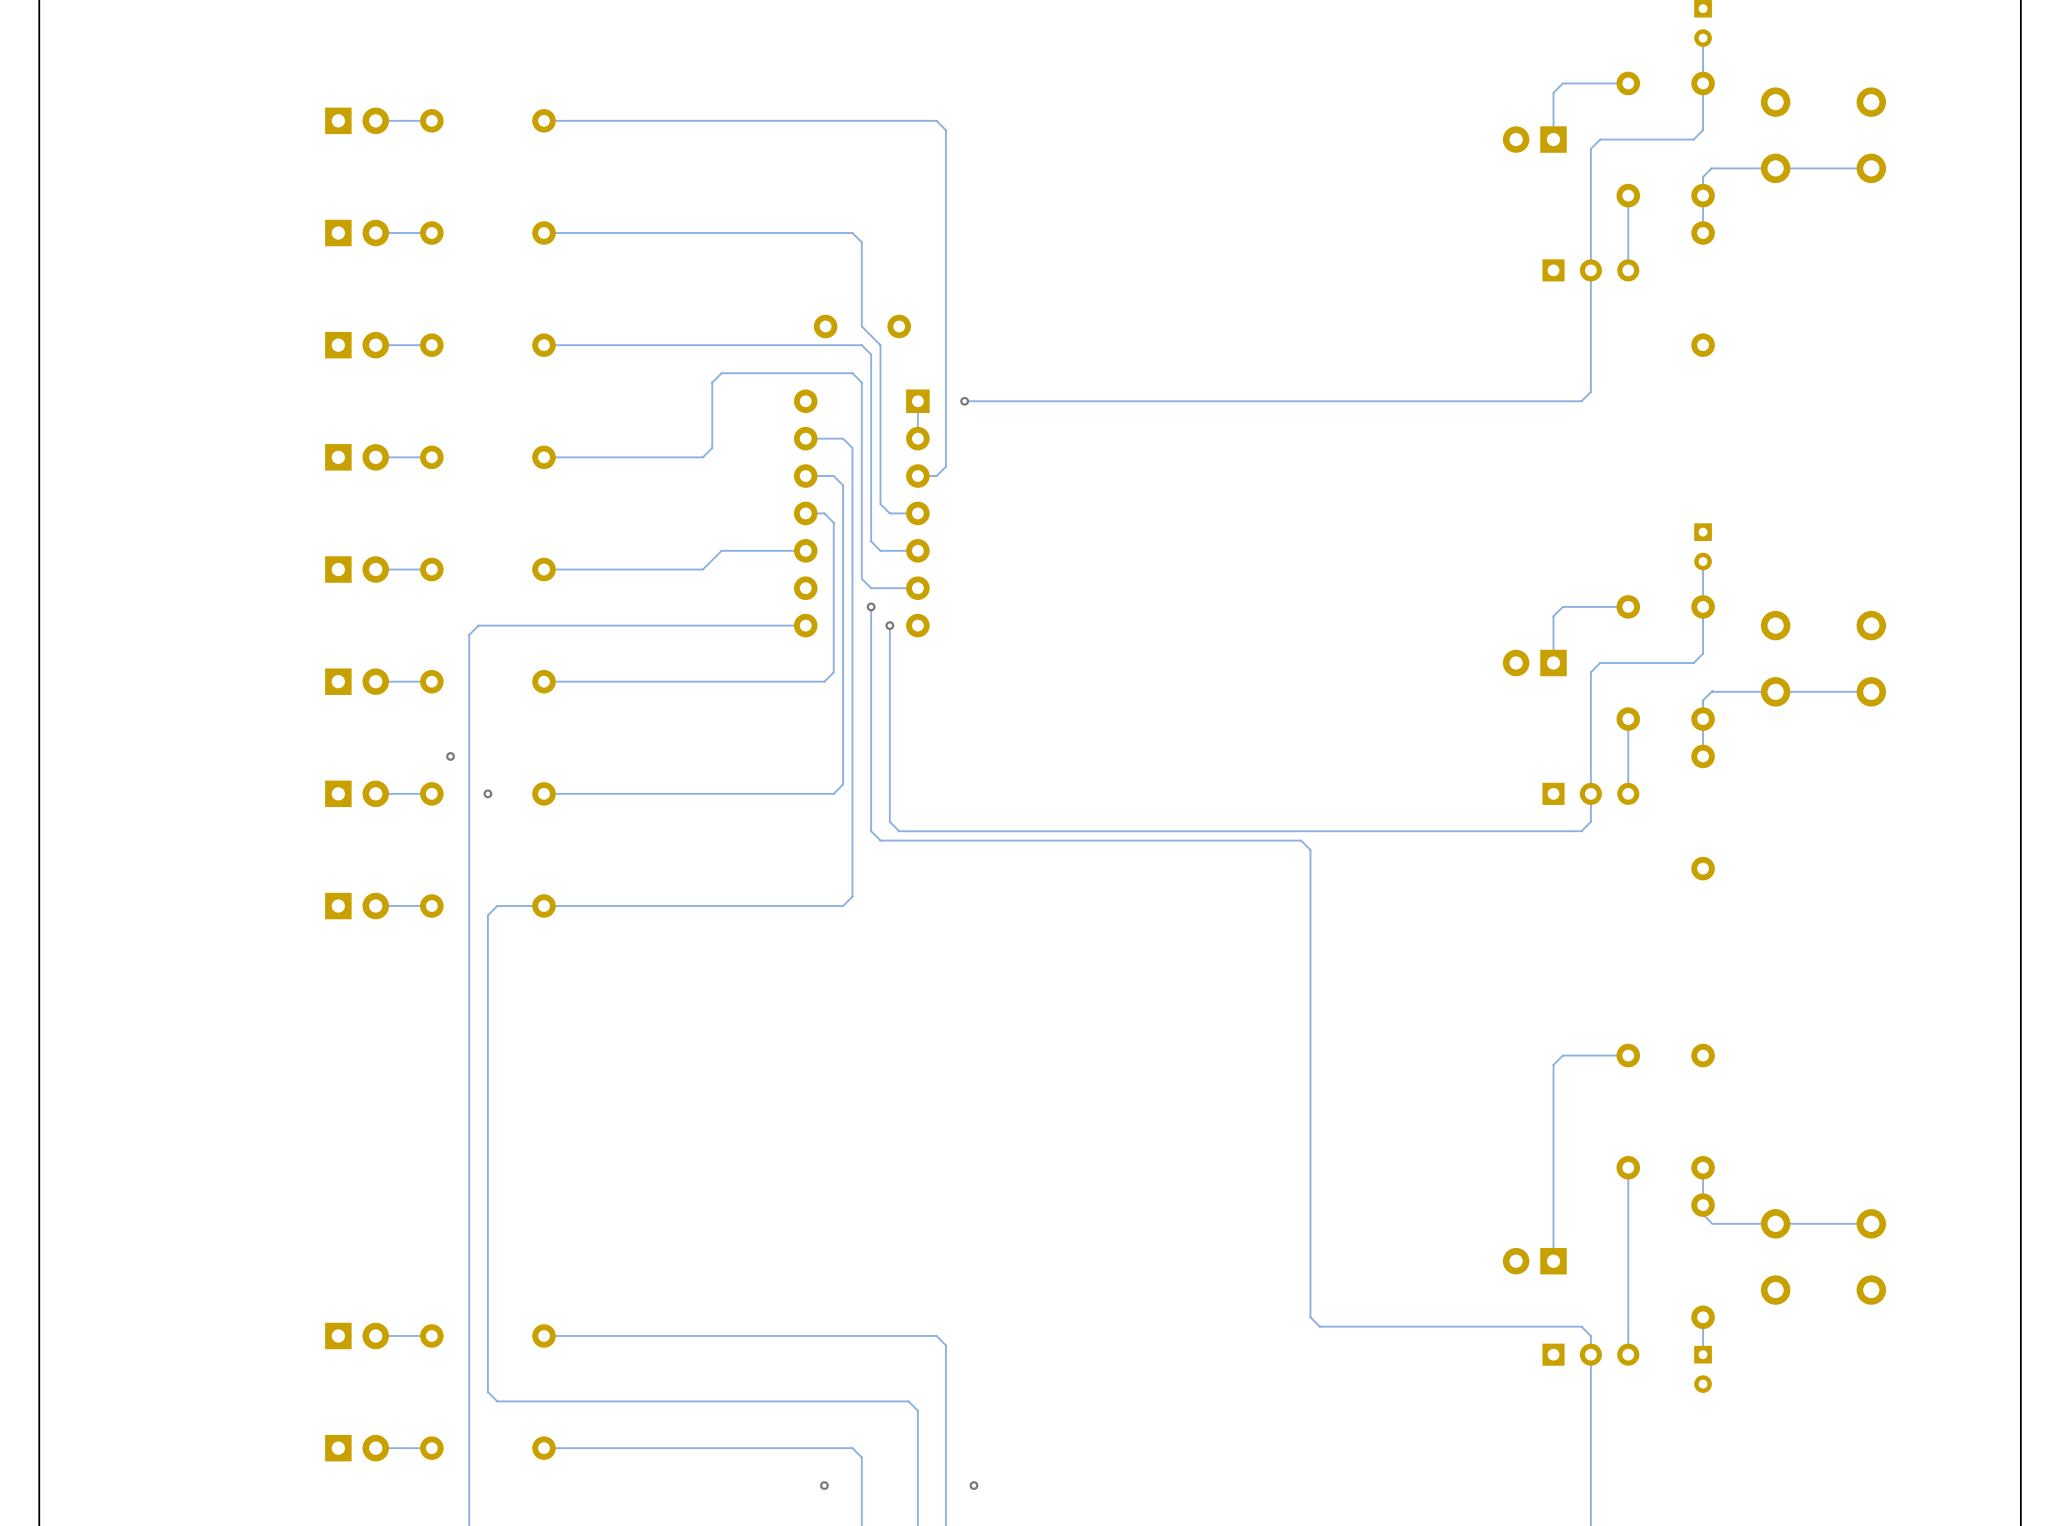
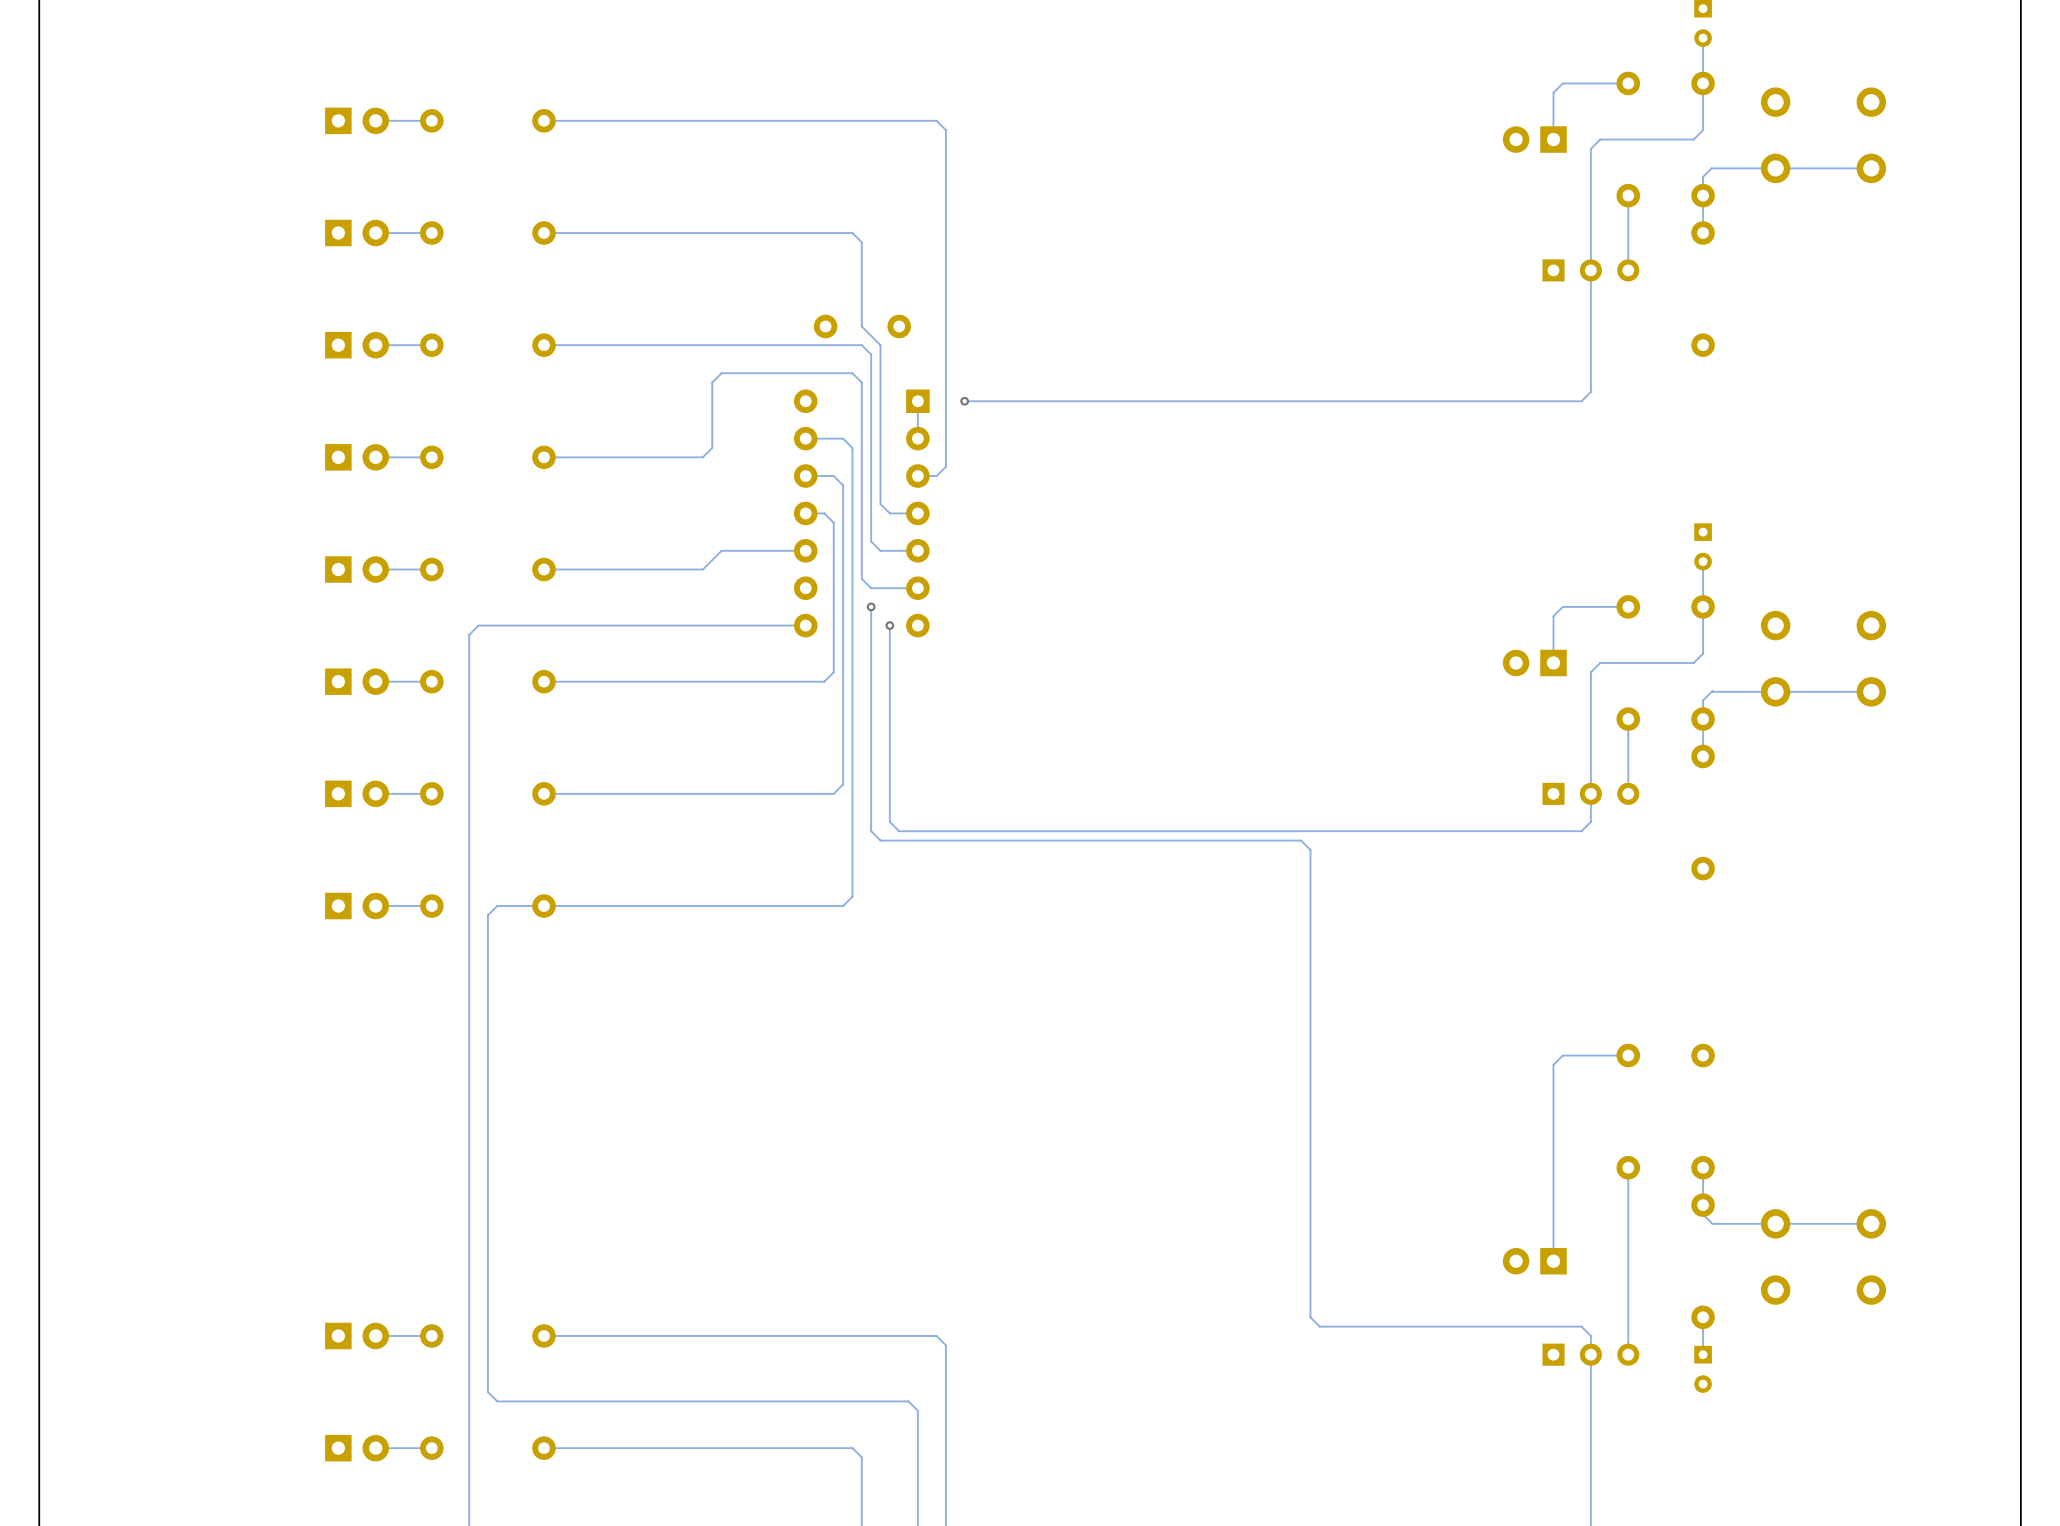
via: (450, 756) -> none
via: (487, 793) -> none
via: (824, 1485) -> none
via: (973, 1485) -> none

